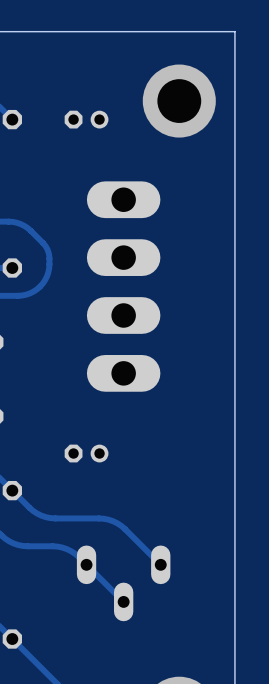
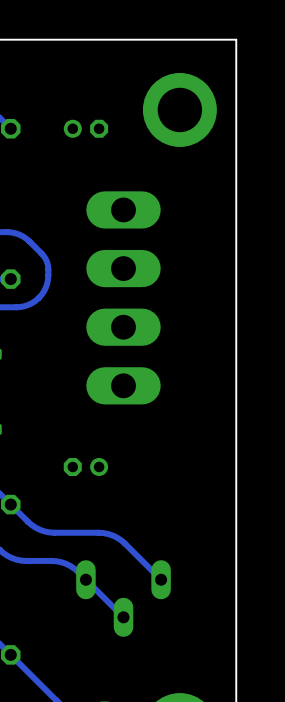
part rotation: 0° (86, 119) -> 180° (85, 128)

